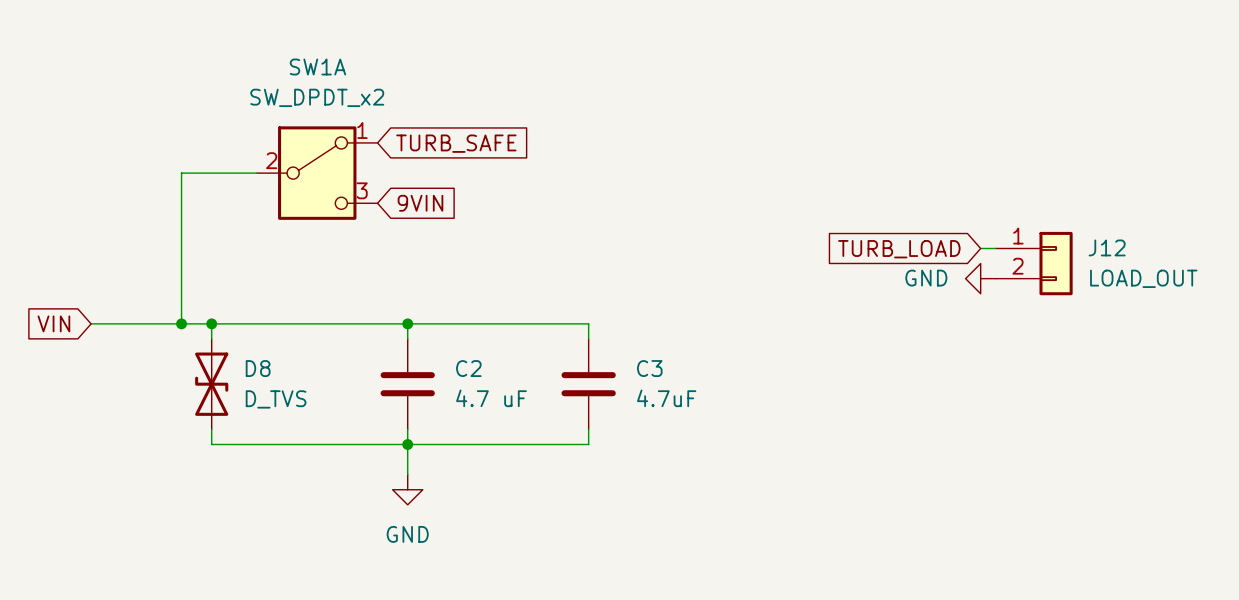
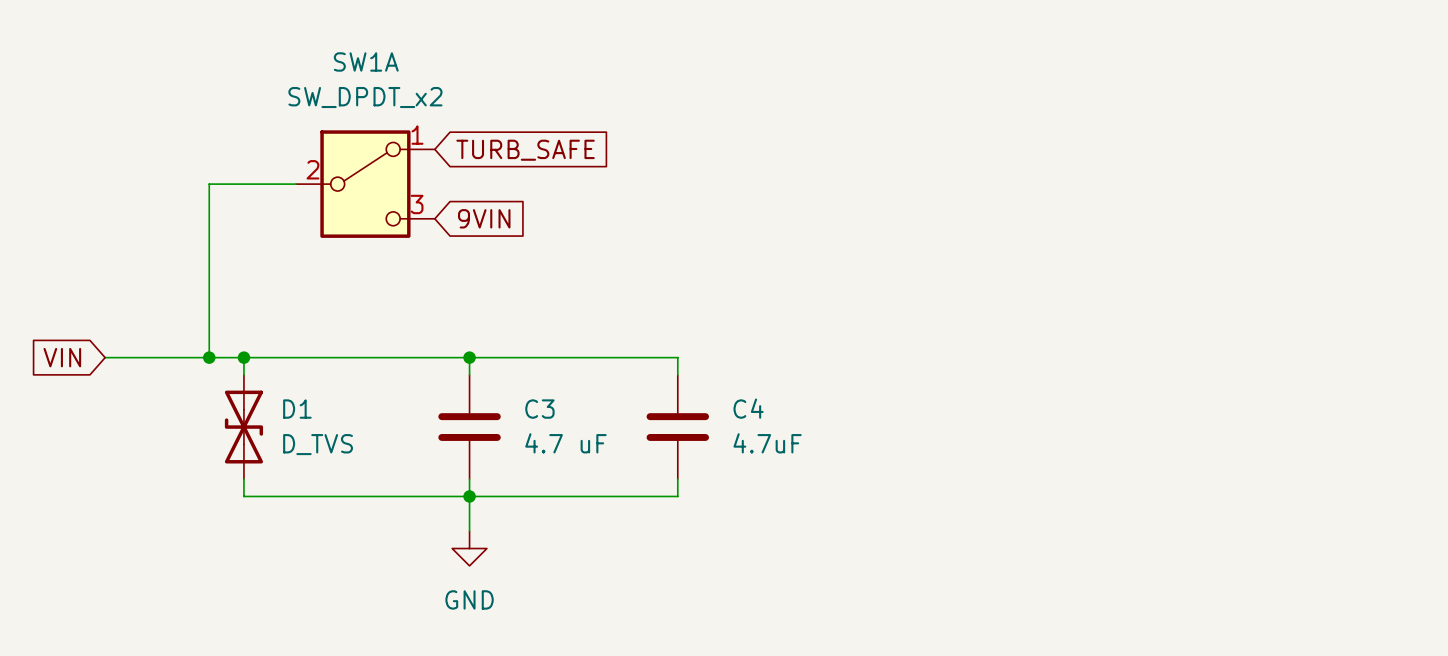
wire: (980, 248) (995, 248) -> none
global label: TURB_LOAD (899, 249) -> none
J12: LOAD_OUT (1034, 263) -> none
power symbol: GND (980, 278) -> none
D8 name: D8 (258, 368) -> D1 (297, 409)
C2 name: C2 (468, 368) -> C3 (539, 409)
C3 name: C3 (649, 368) -> C4 (748, 408)

